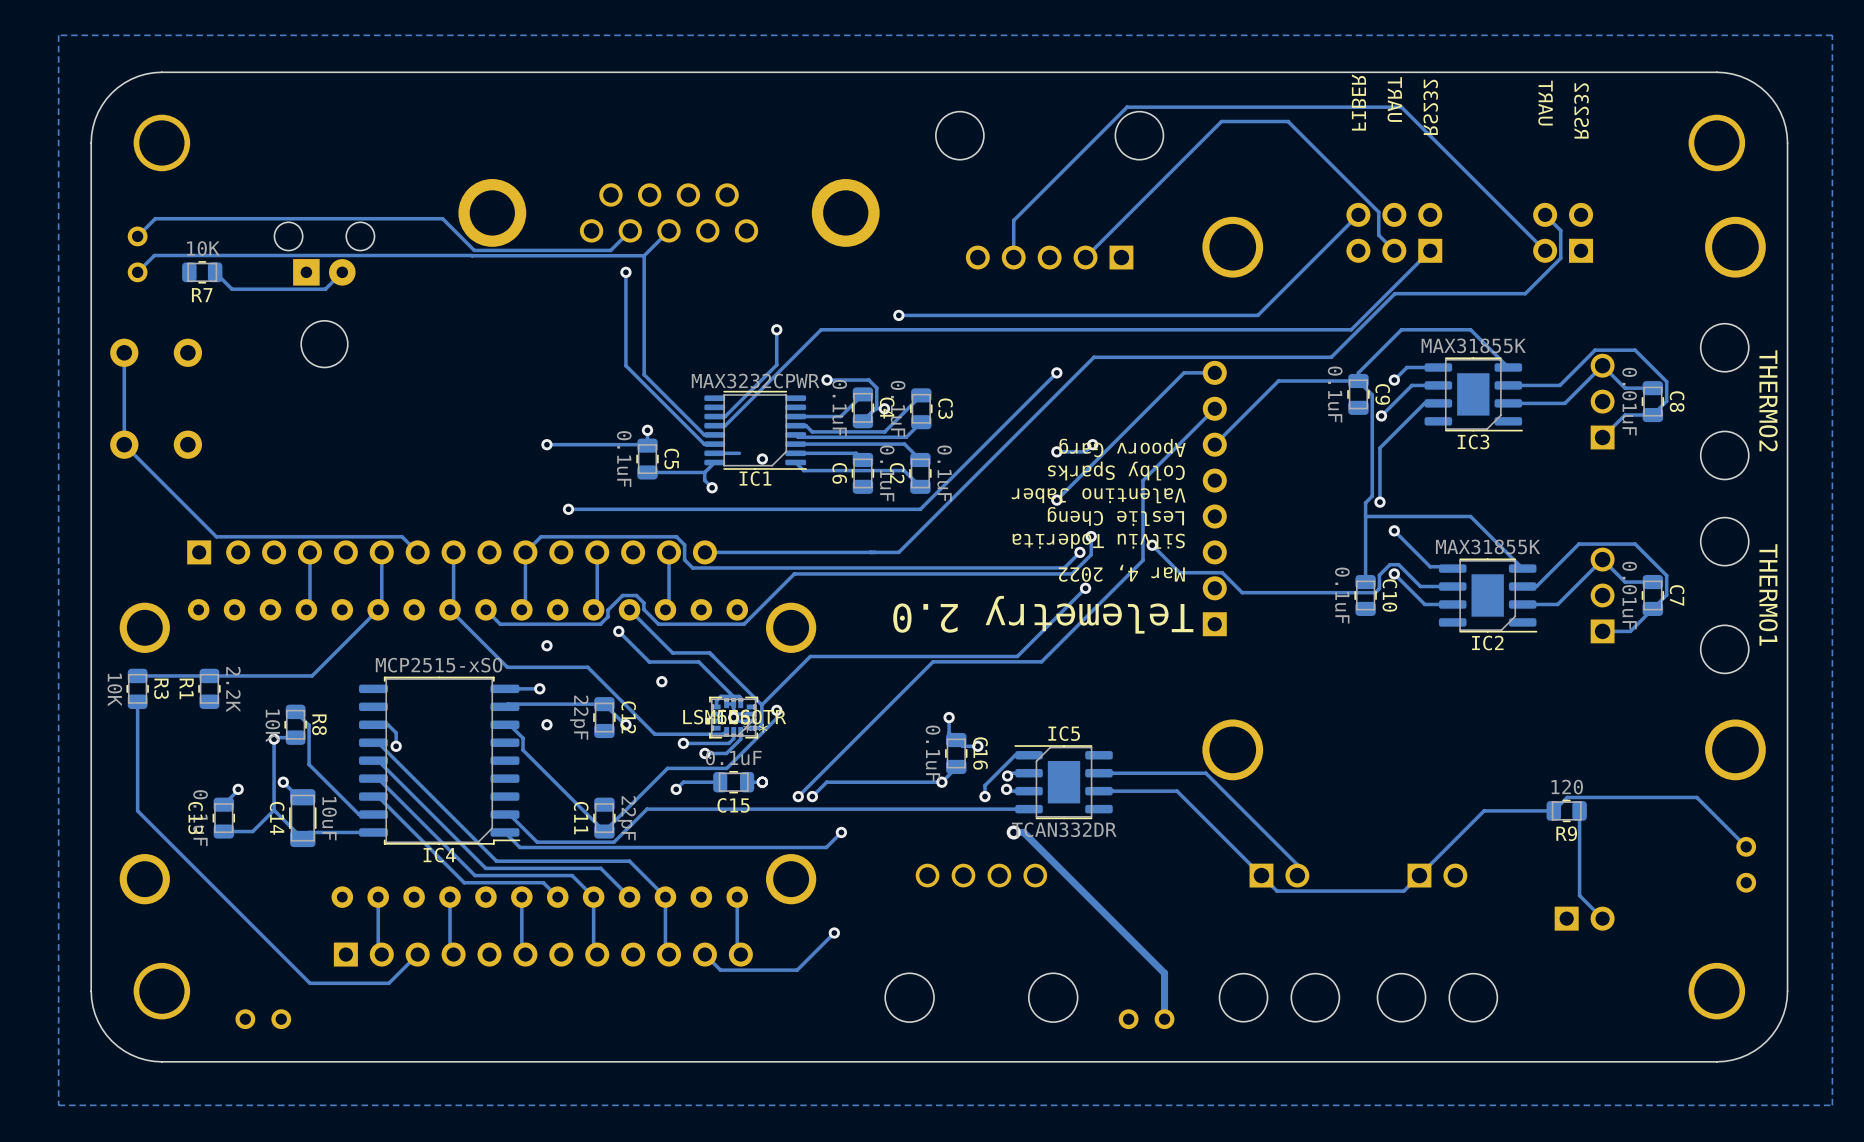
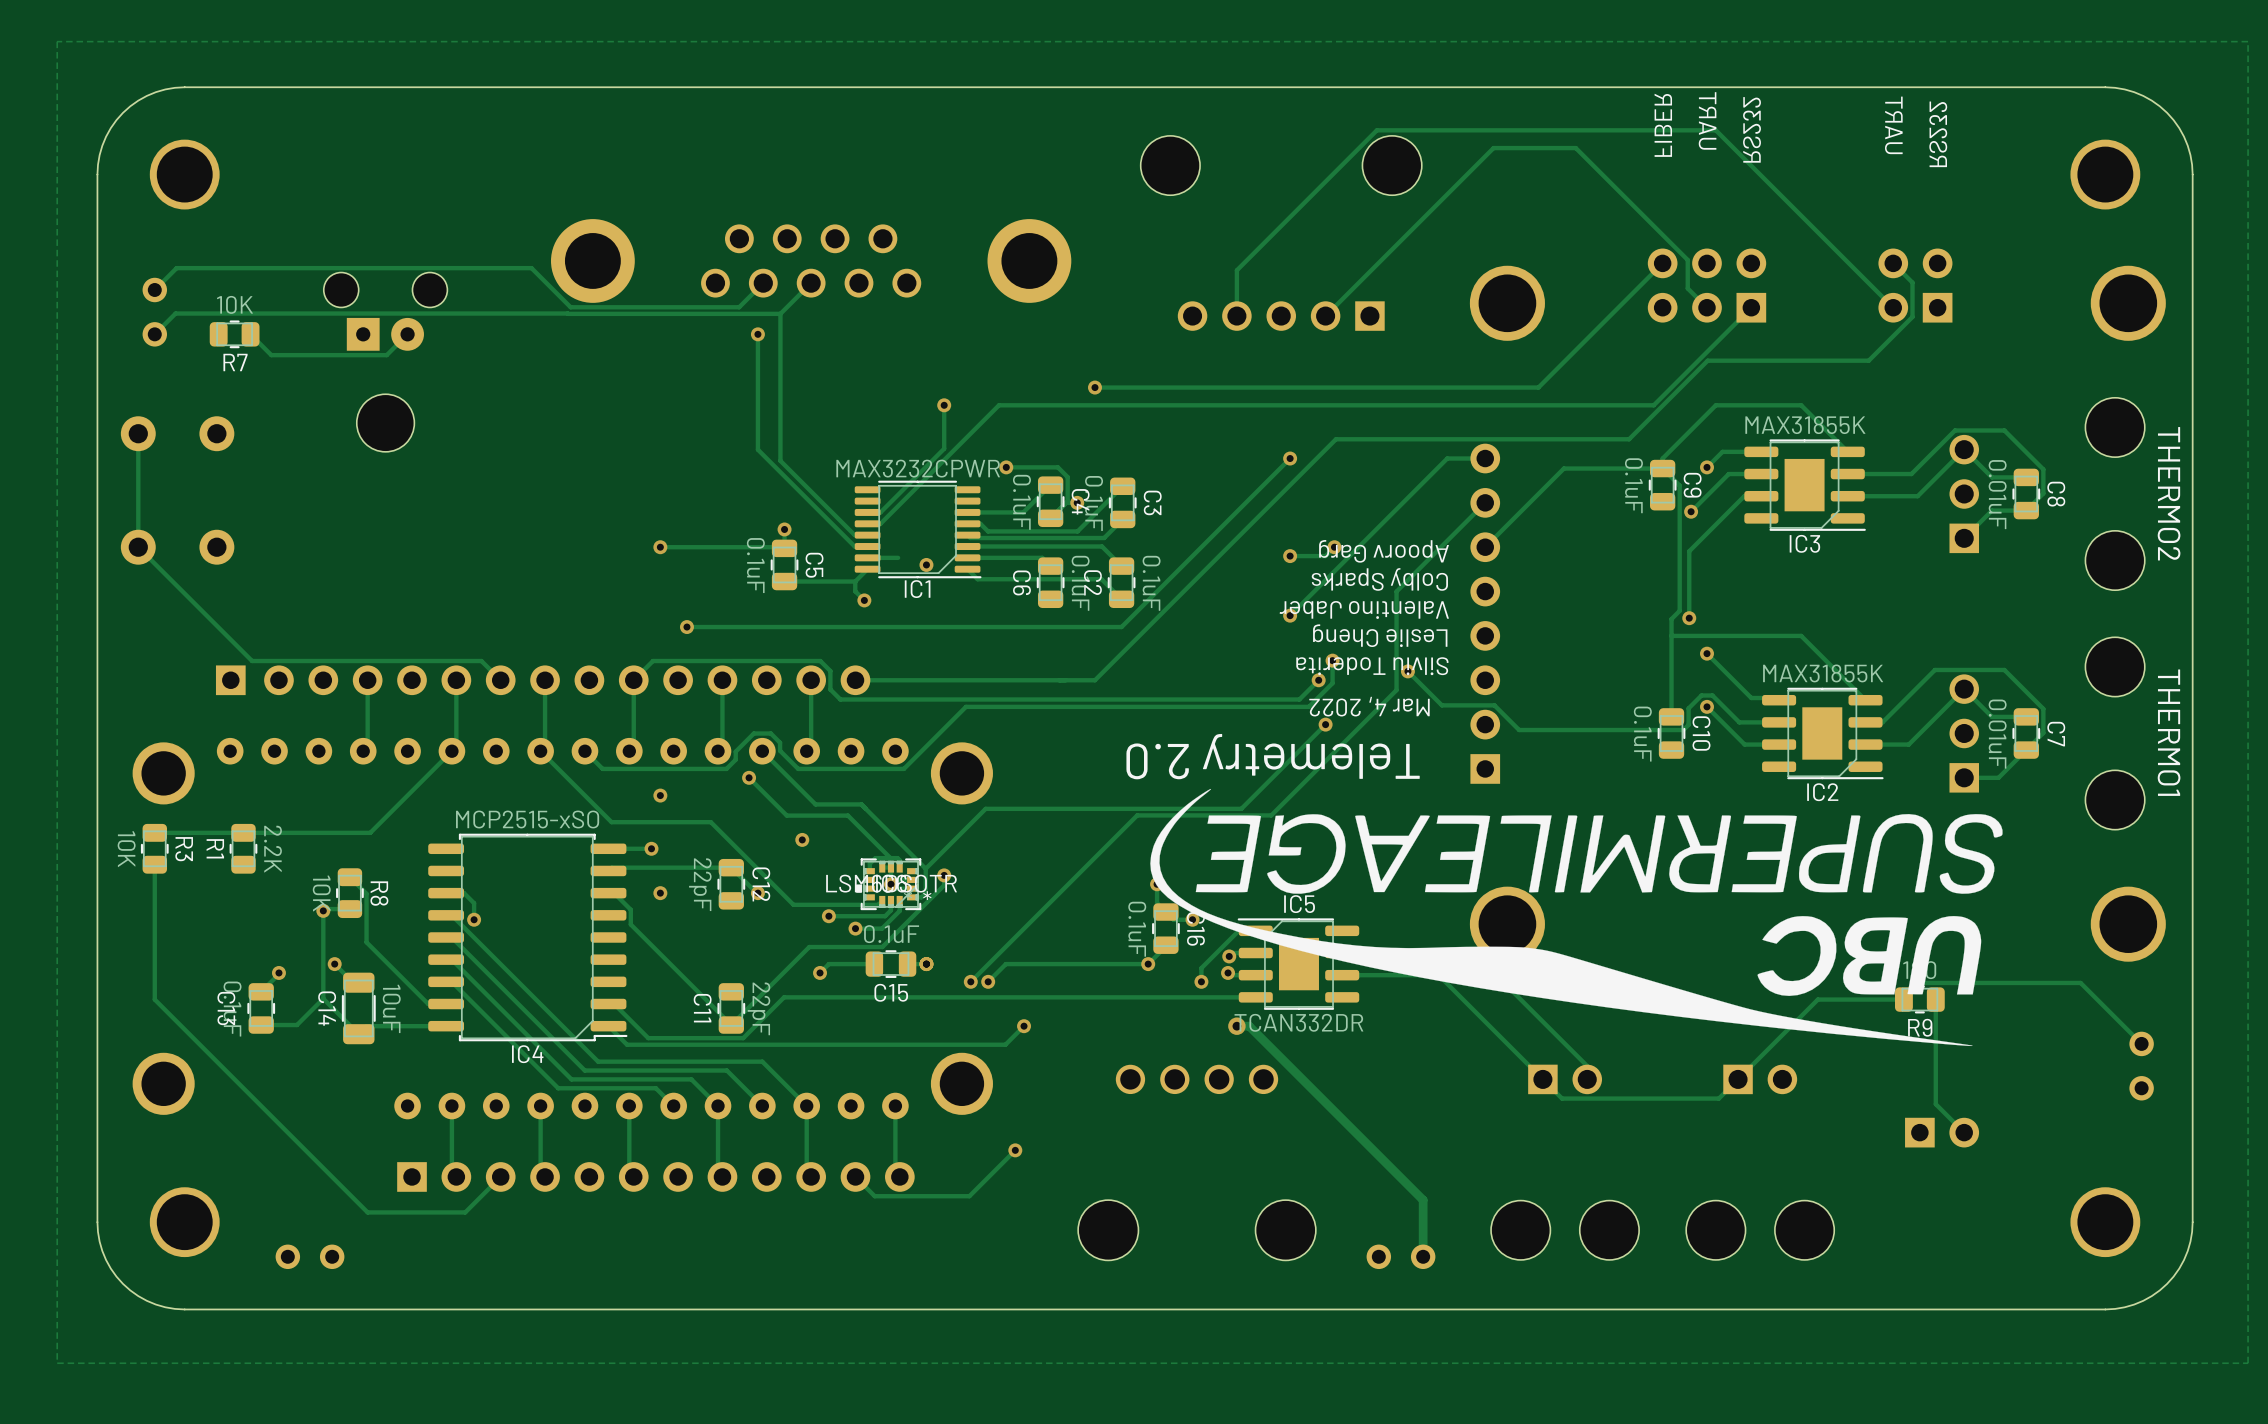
drawing: none -> [1150, 788, 2003, 1047]

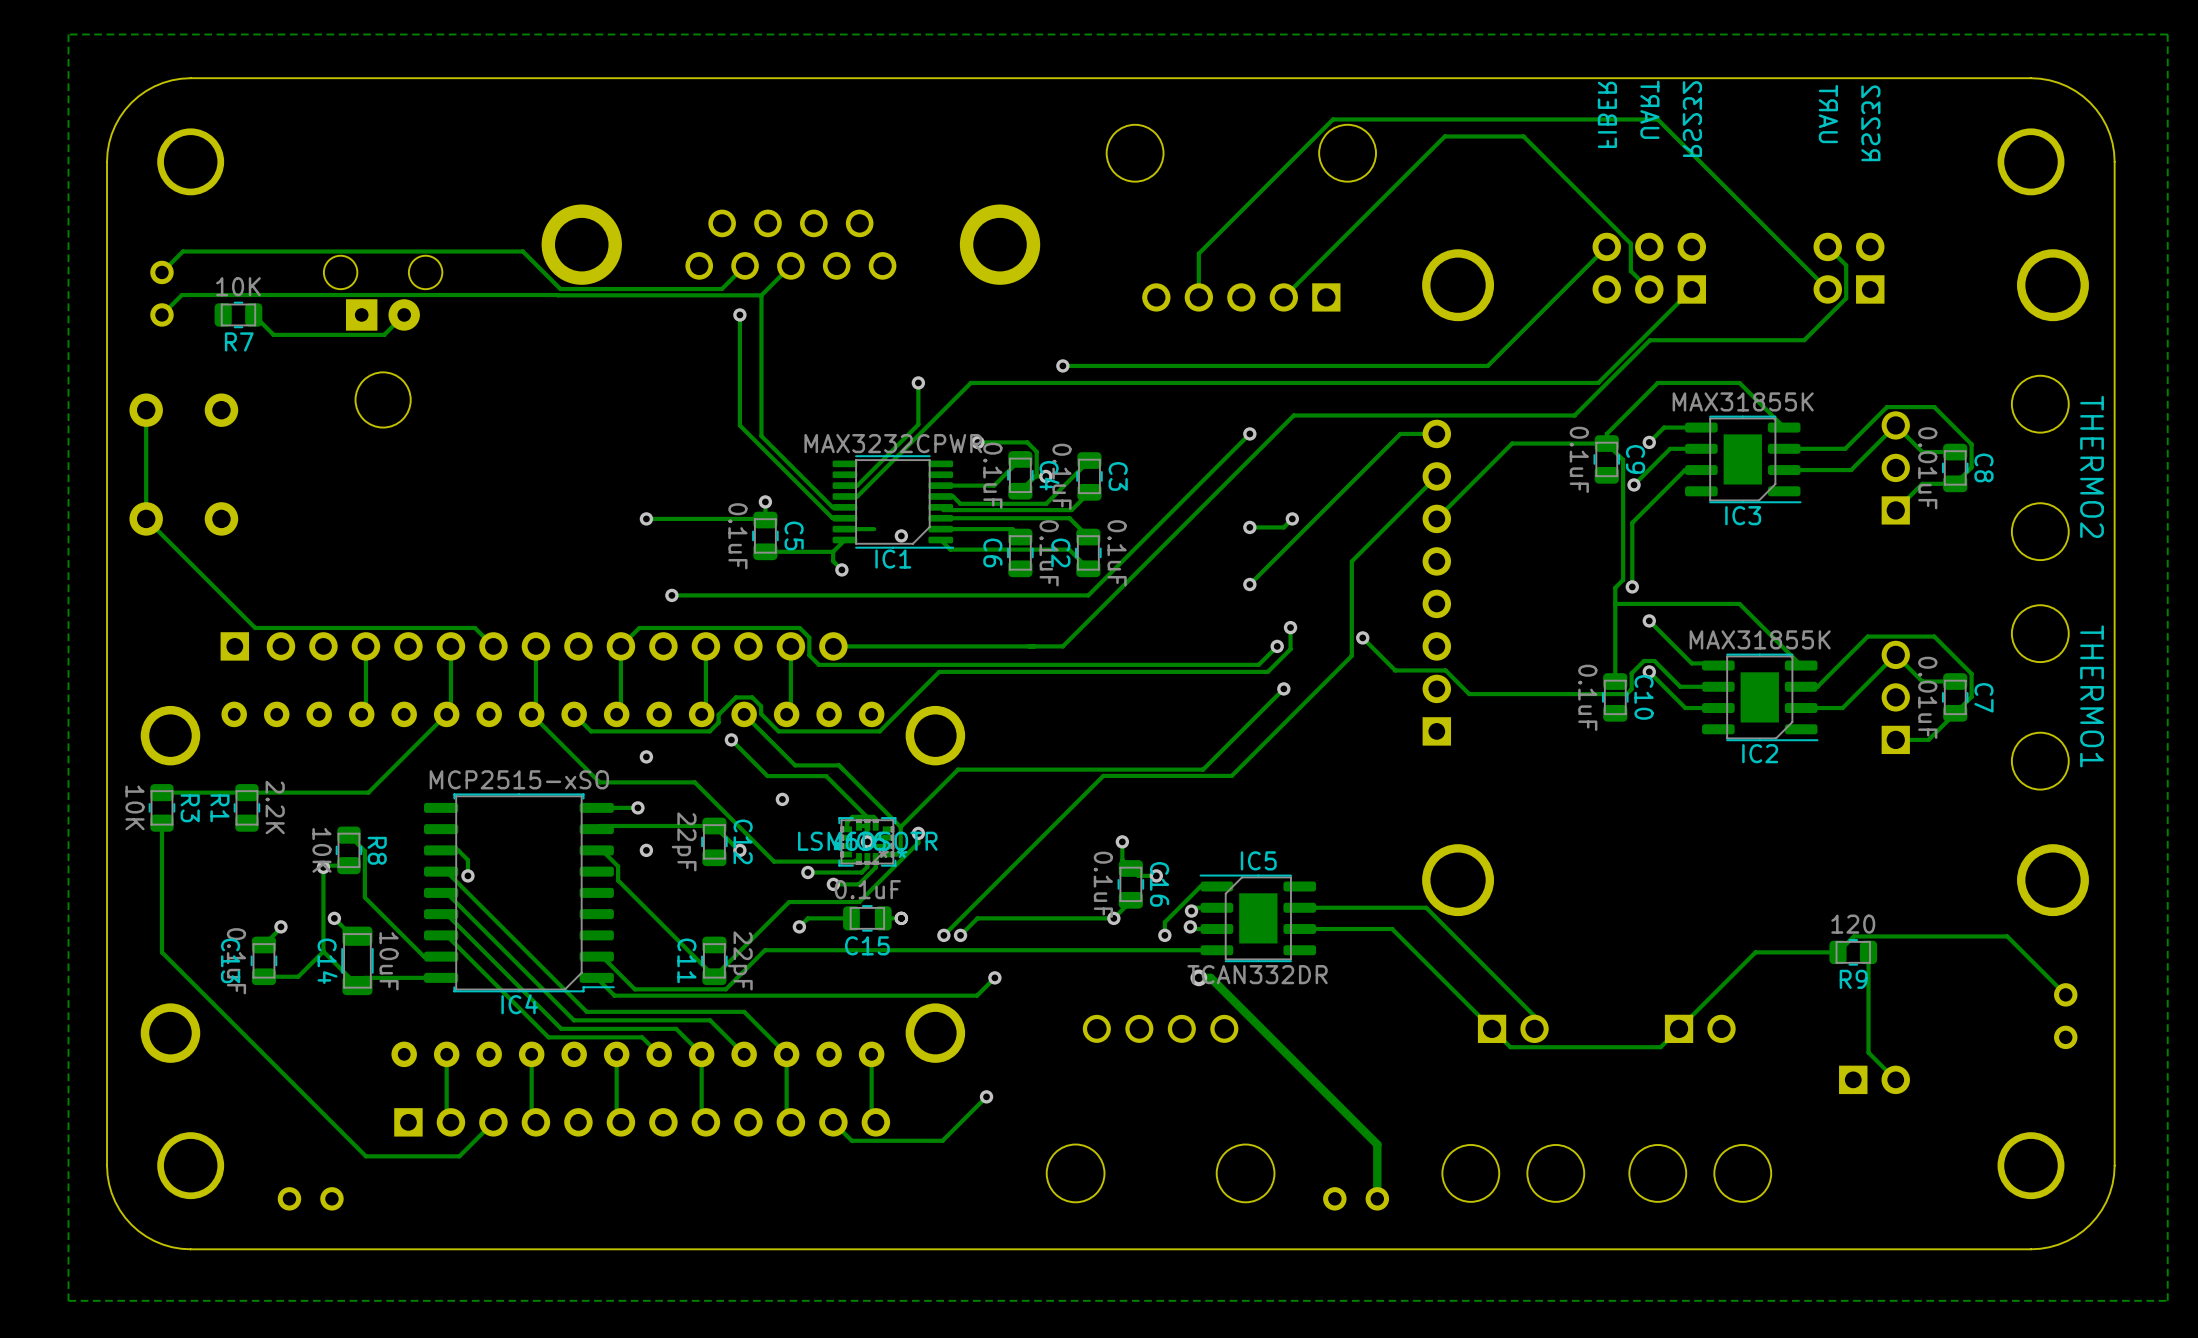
text: Apoorv Garg (1384, 551) -> none
text: Colby Sparks (1379, 579) -> none
text: Valentino Jaber (1364, 609) -> none
text: Leslie Cheng (1380, 635) -> none
text: Silviu Toderita (1372, 666) -> none
text: Mar 4, 2022 (1369, 706) -> none
text: Telemetry 2.0 (1273, 756) -> none
drawing: [1150, 788, 2003, 1047] -> none

